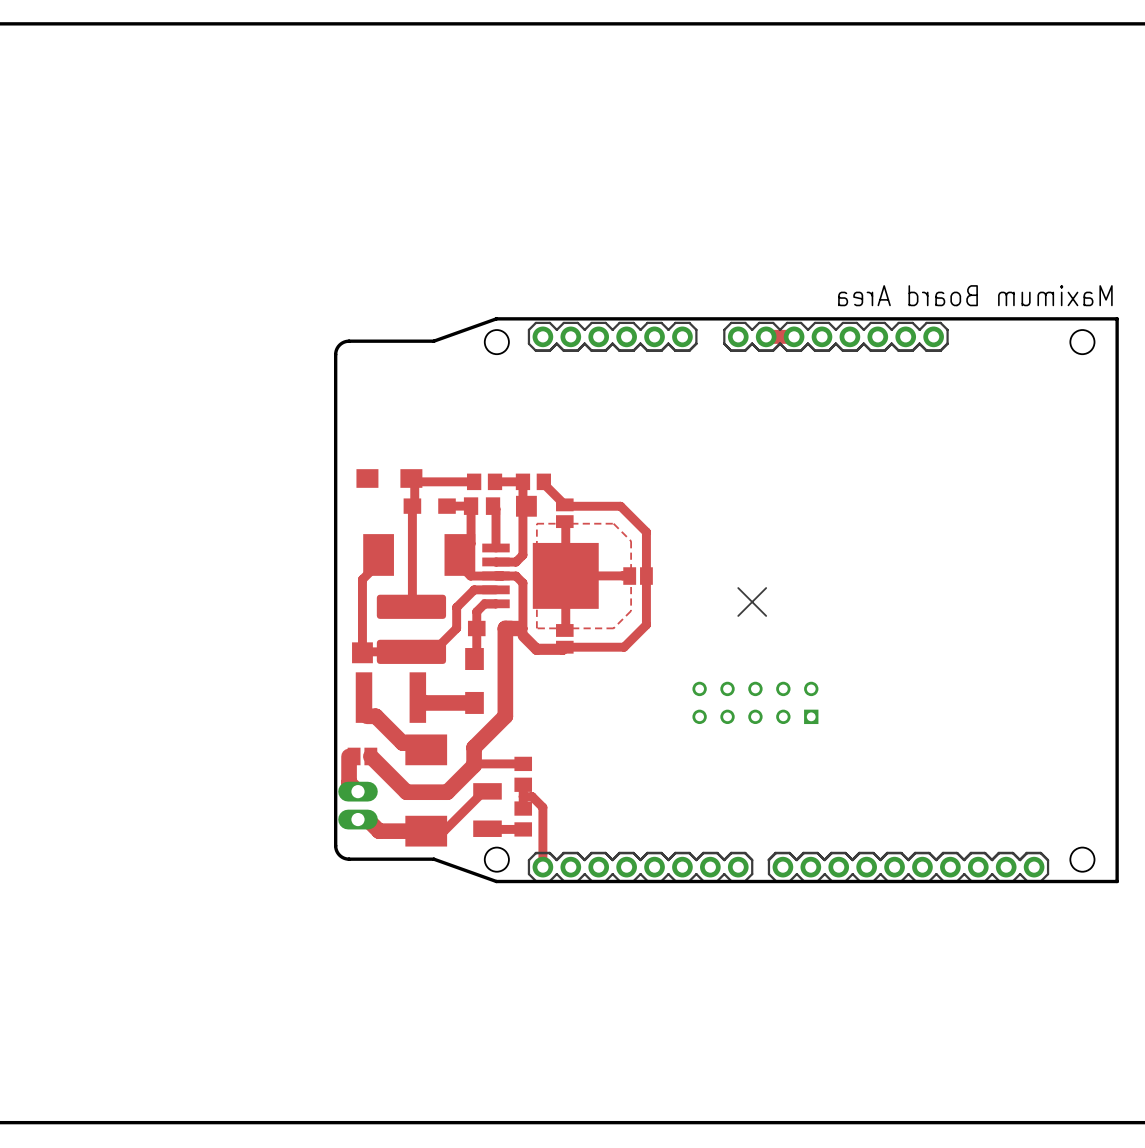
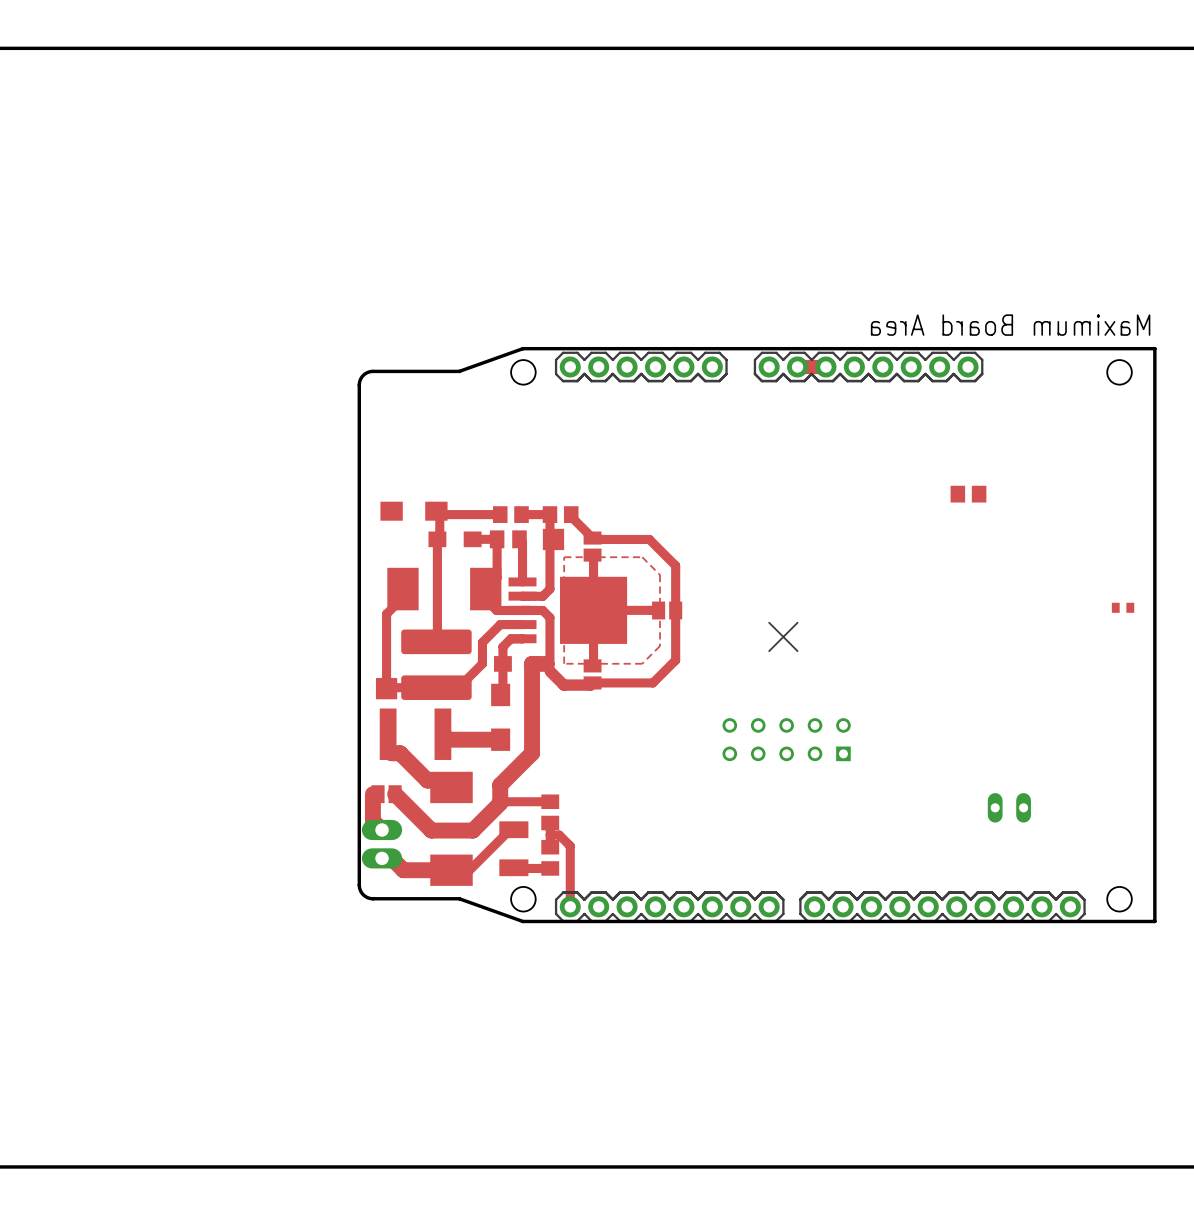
part: none -> (968, 494)
part: none -> (1123, 607)
part: none -> (1009, 807)

